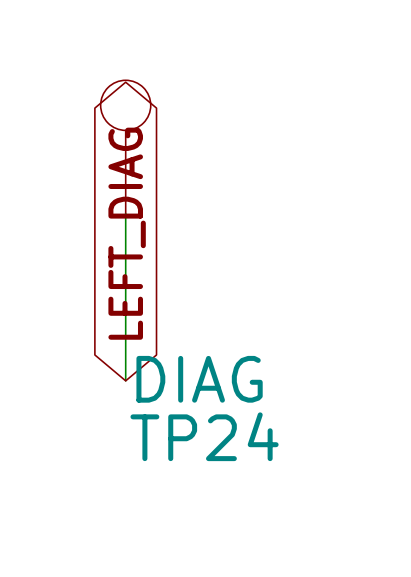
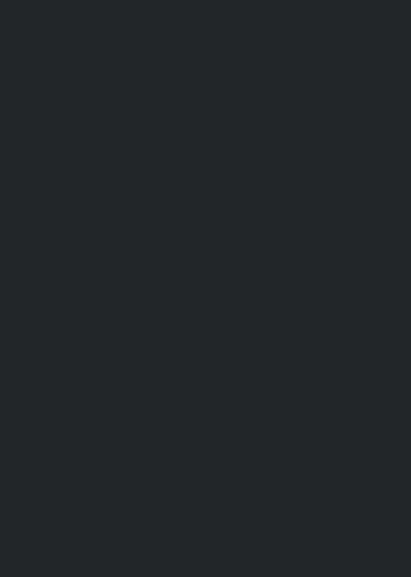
TP24: DIAG (125, 147) -> none
wire: (125, 213) (125, 380) -> none
global label: LEFT_DIAG (127, 233) -> none

